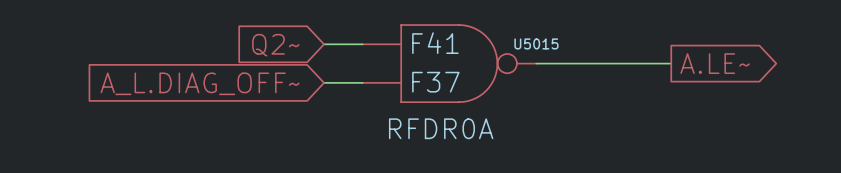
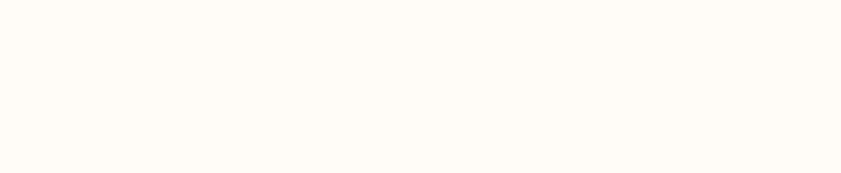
wire: (324, 44) (362, 44) -> none
global label: Q2~ (275, 45) -> none
U5015: F37 (449, 63) -> none
wire: (536, 63) (671, 63) -> none
global label: A.LE~ (715, 63) -> none
wire: (324, 82) (362, 82) -> none
global label: A_L.DIAG_OFF~ (200, 83) -> none

